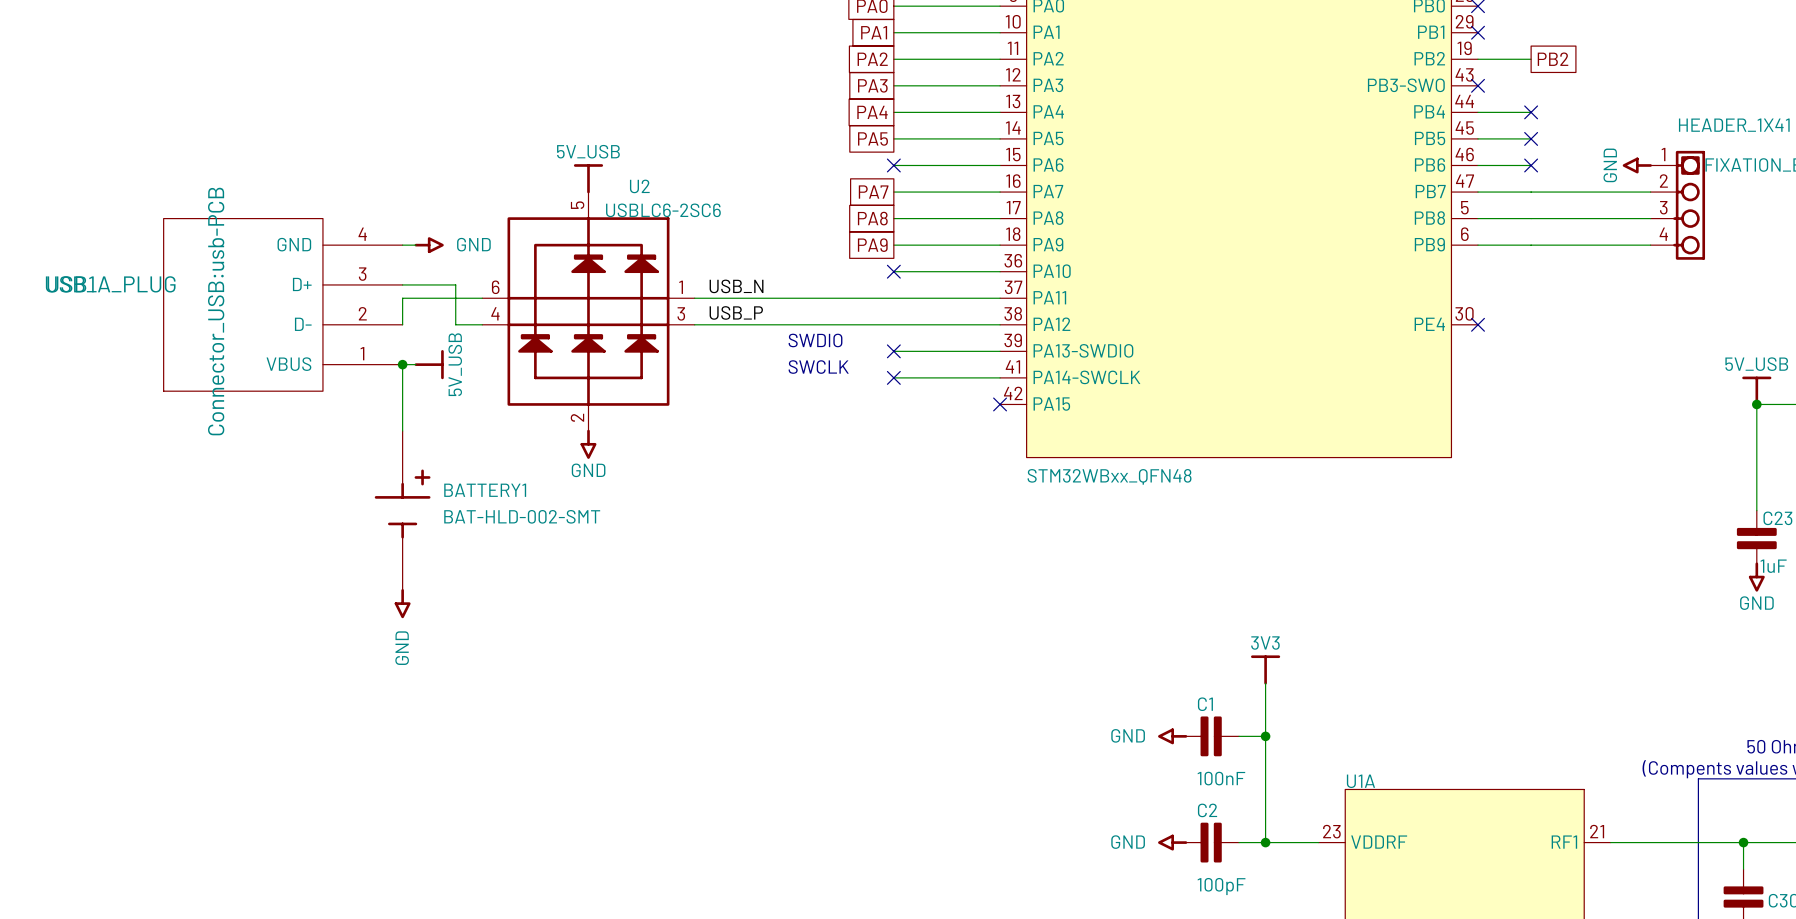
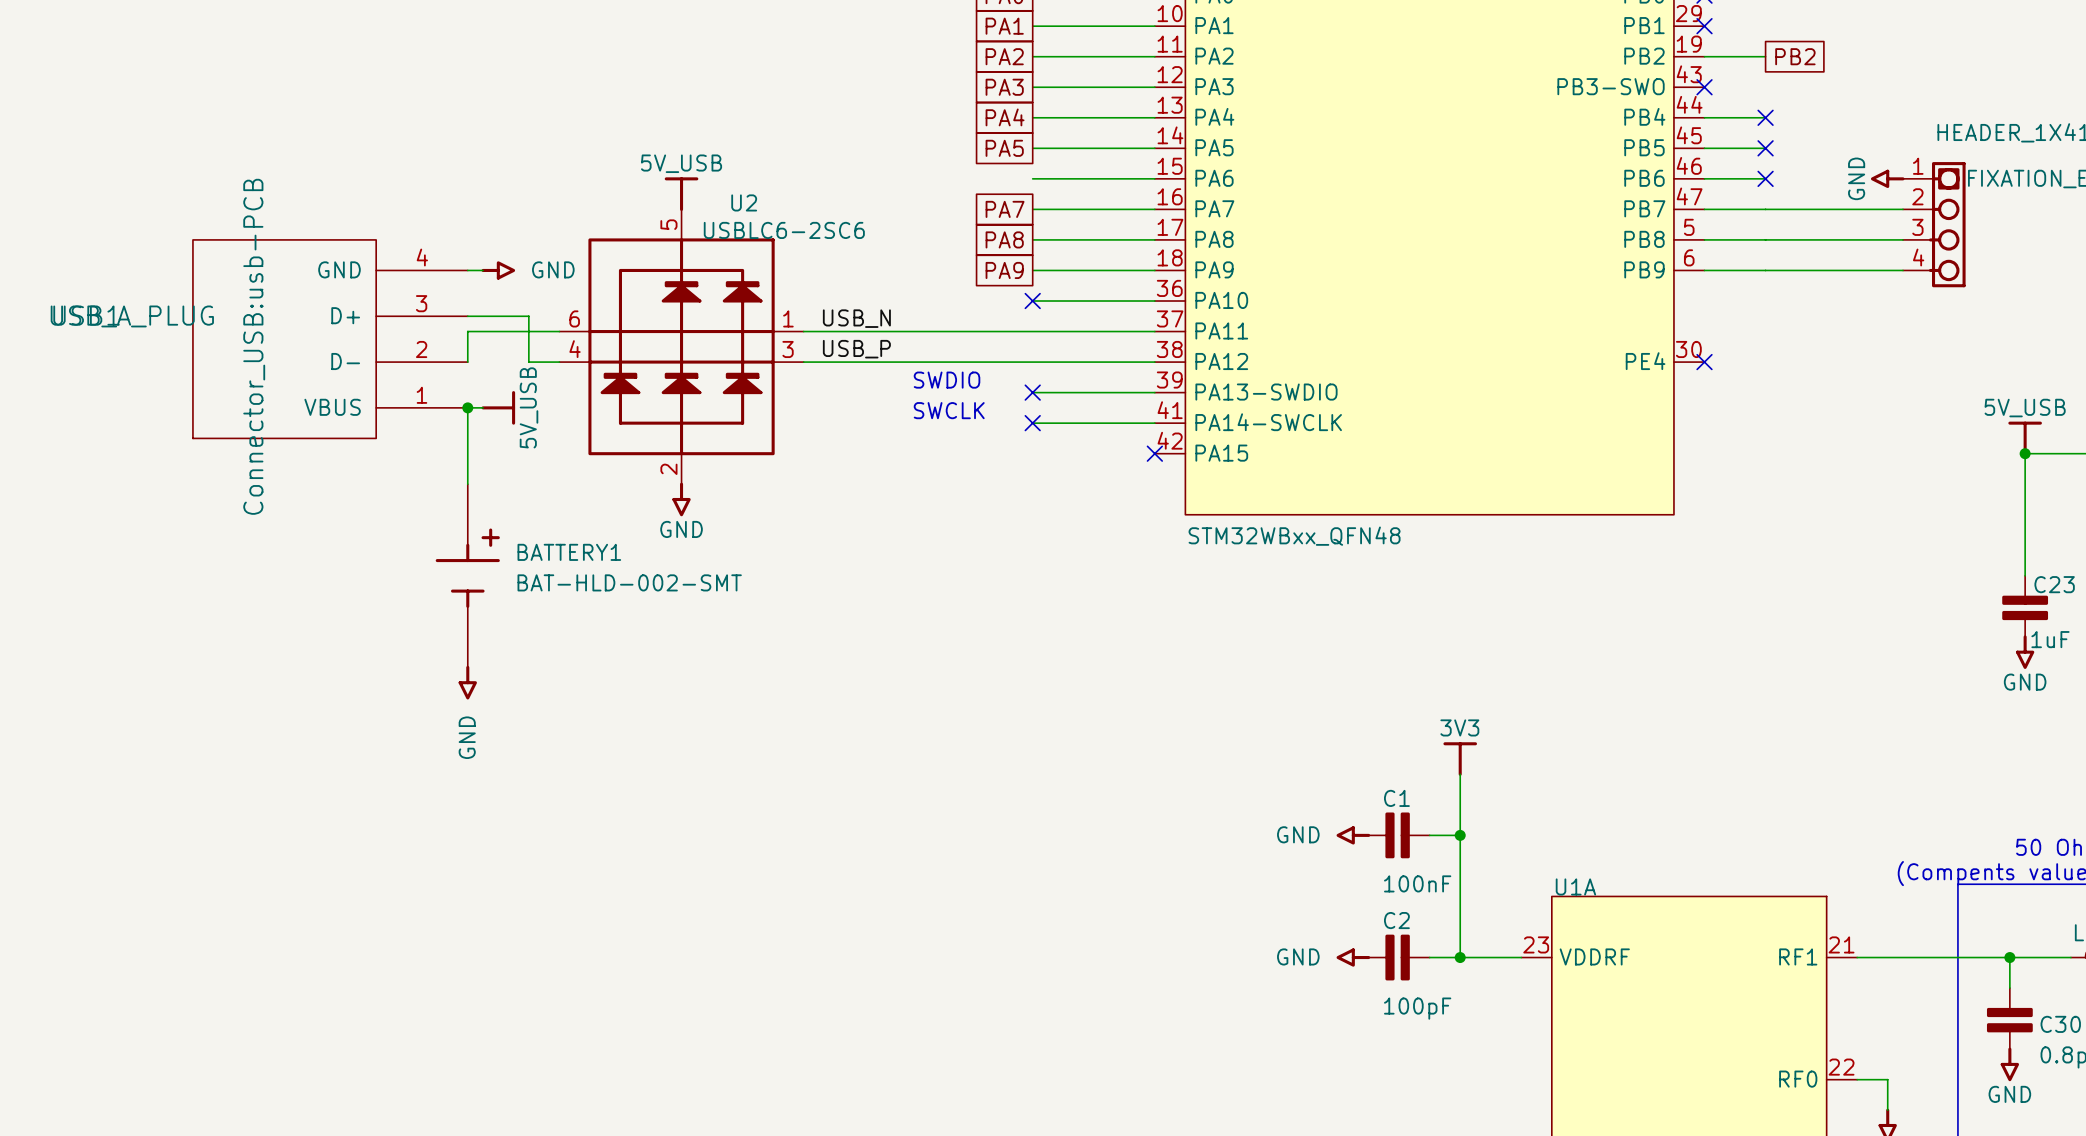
no-connect mark: (893, 165) -> none

